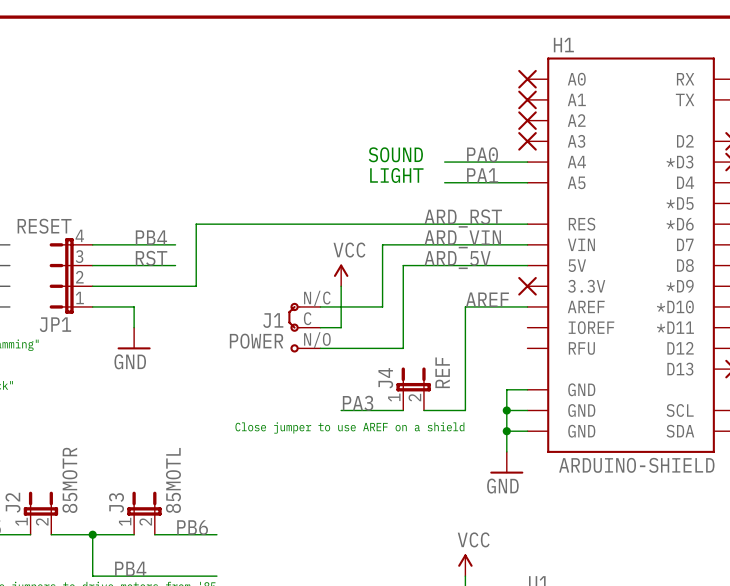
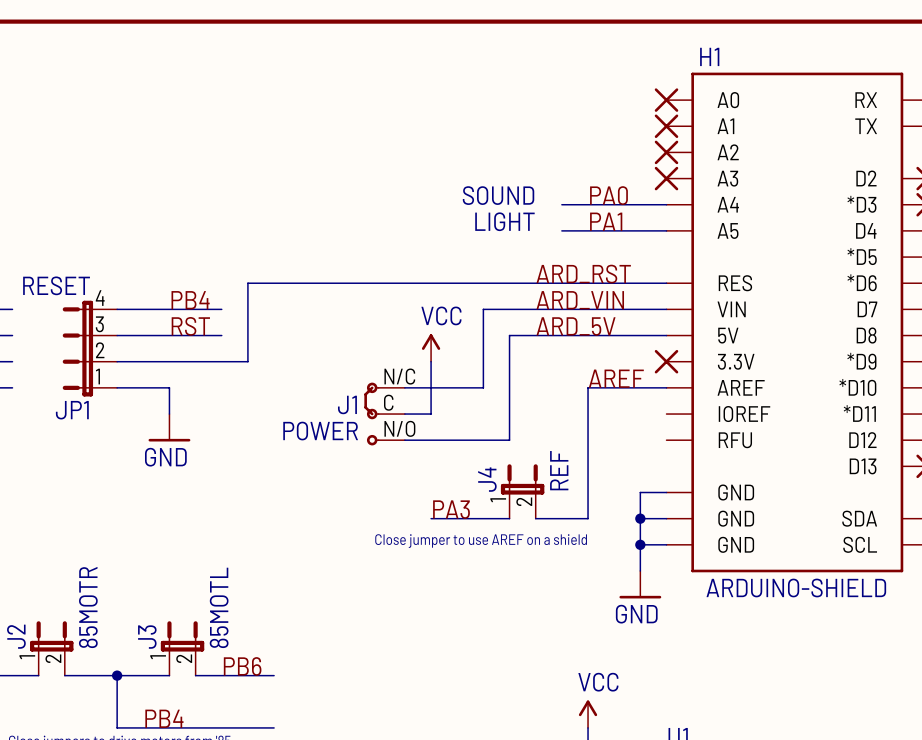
H1 pin name: SCL (680, 410) -> SDA (859, 518)
H1 pin name: SDA (680, 431) -> SCL (860, 544)

